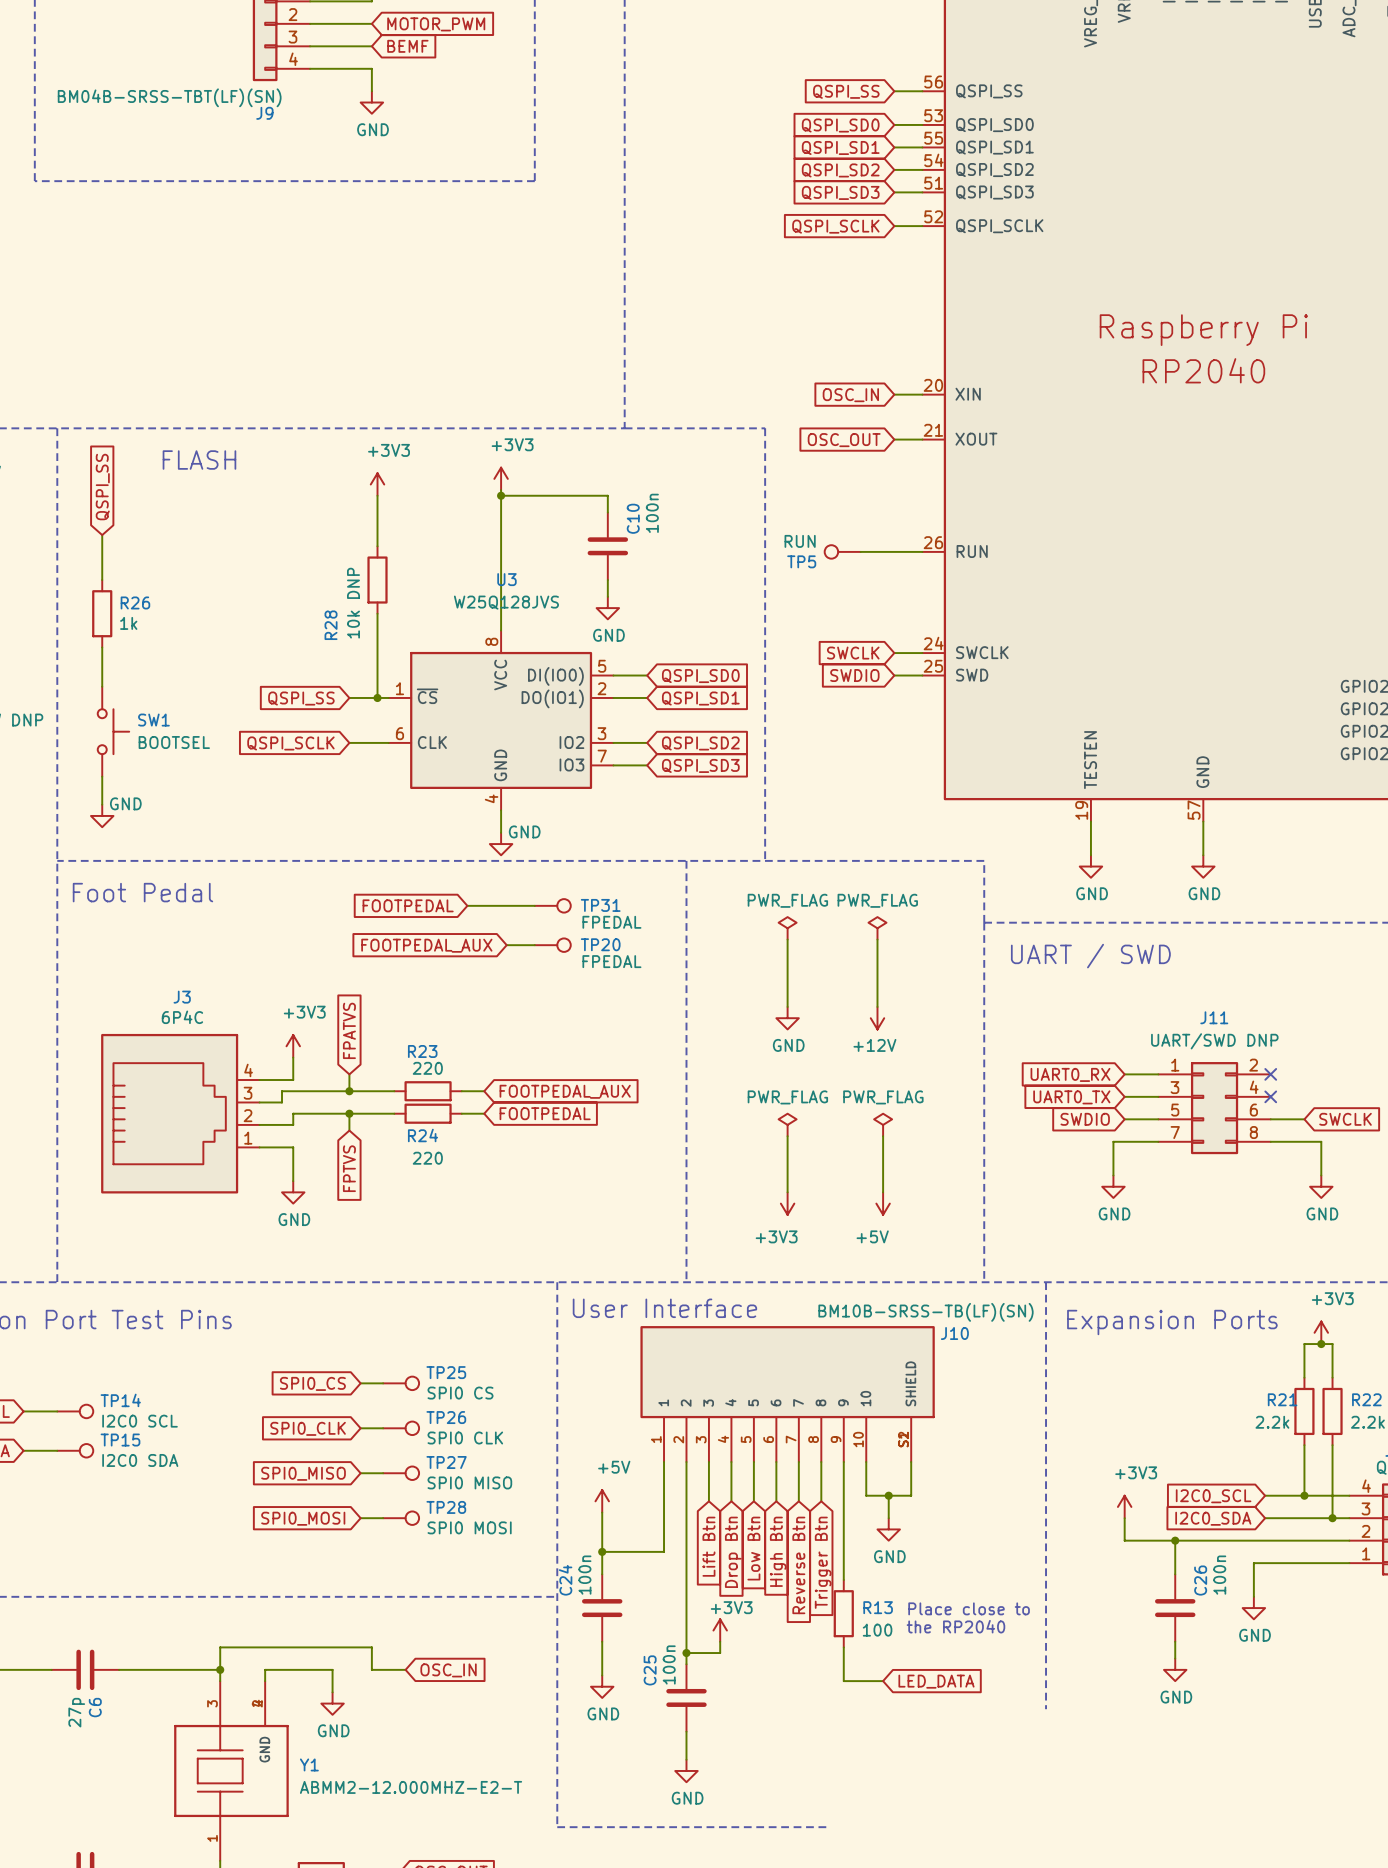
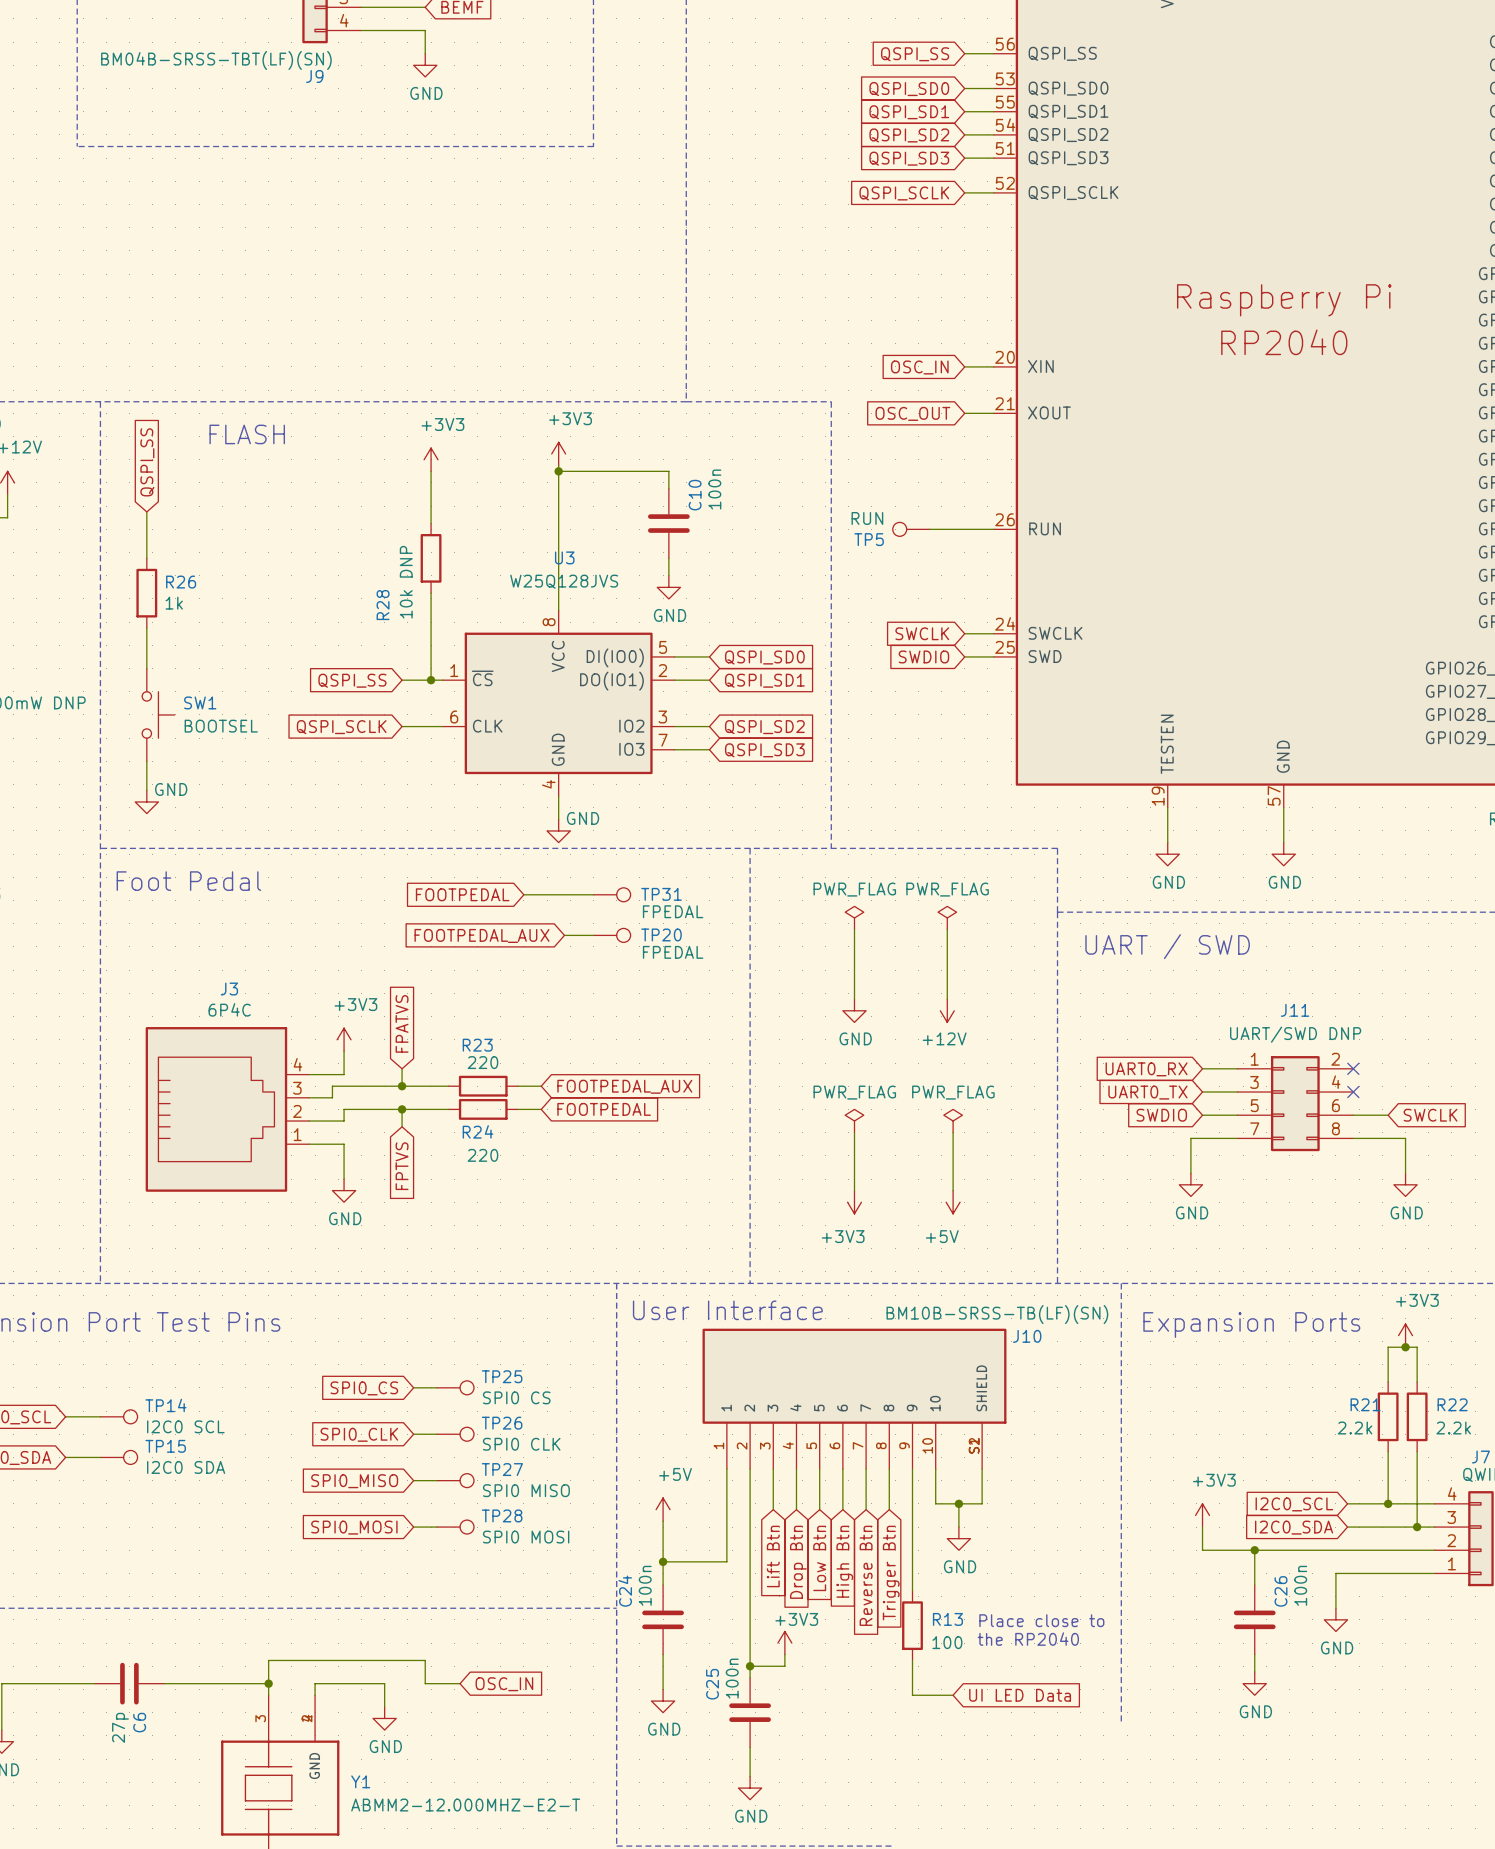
global label: LED_DATA (936, 1681) -> UI LED Data (1020, 1695)

